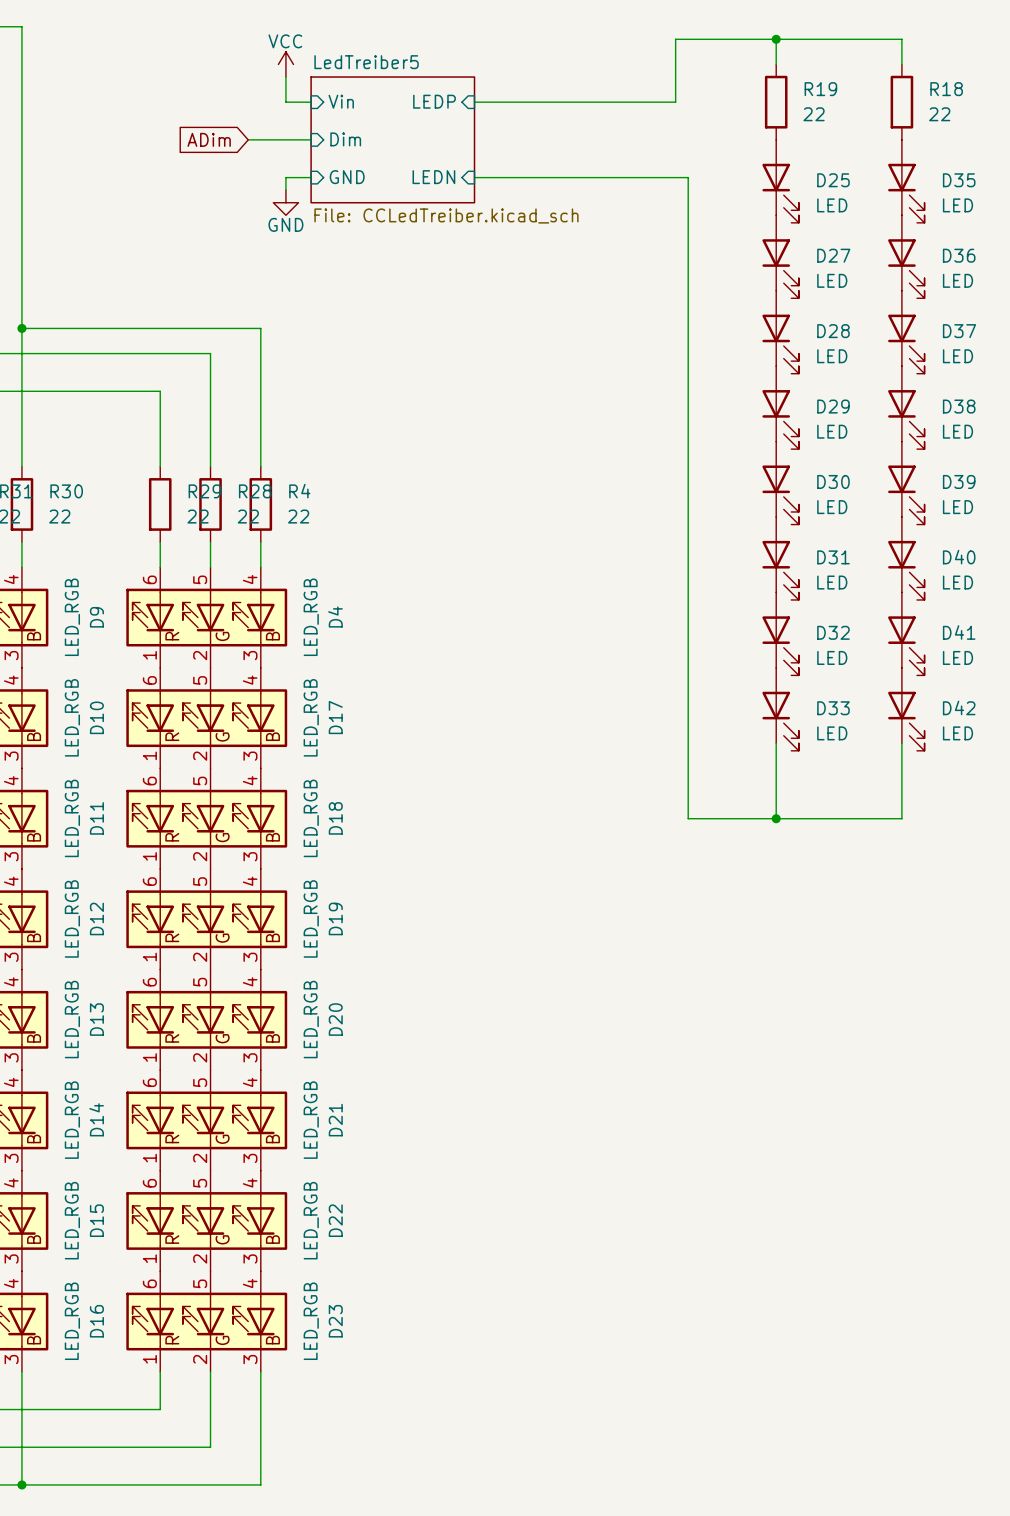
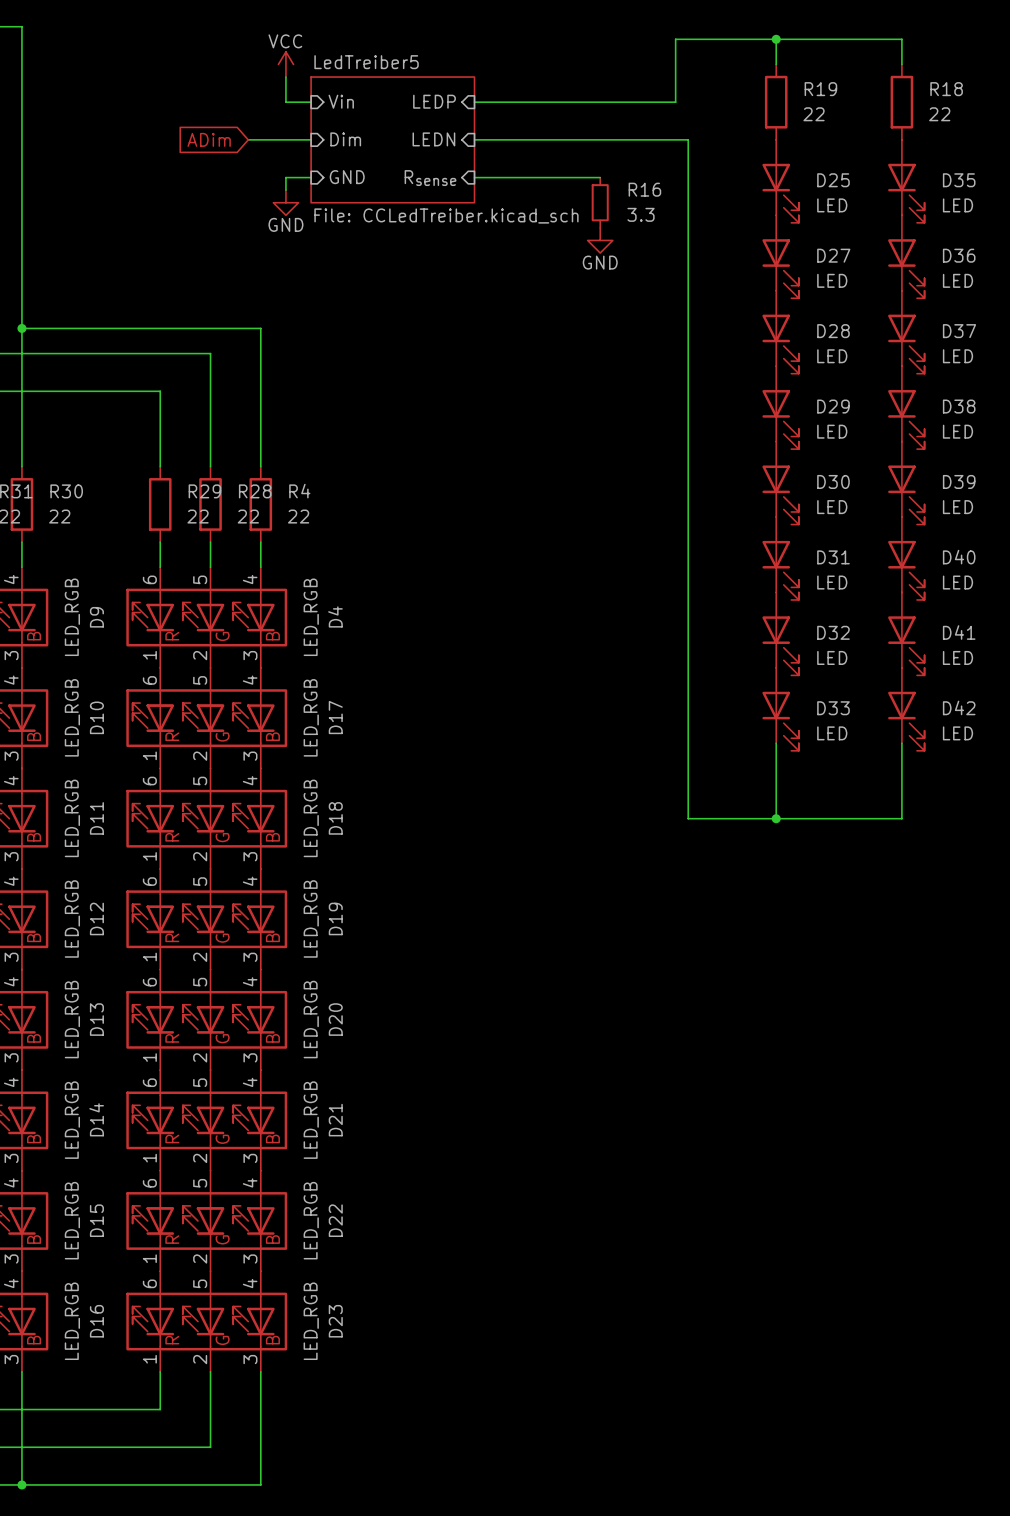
sheet pin: none -> LEDN (433, 139)
sheet pin: LEDN (433, 177) -> Rsense (430, 178)
wire: (600, 177) (688, 177) -> (474, 139) (688, 139) (688, 177)
R16: none -> 3.3 (600, 202)
power symbol: none -> GND (600, 240)

